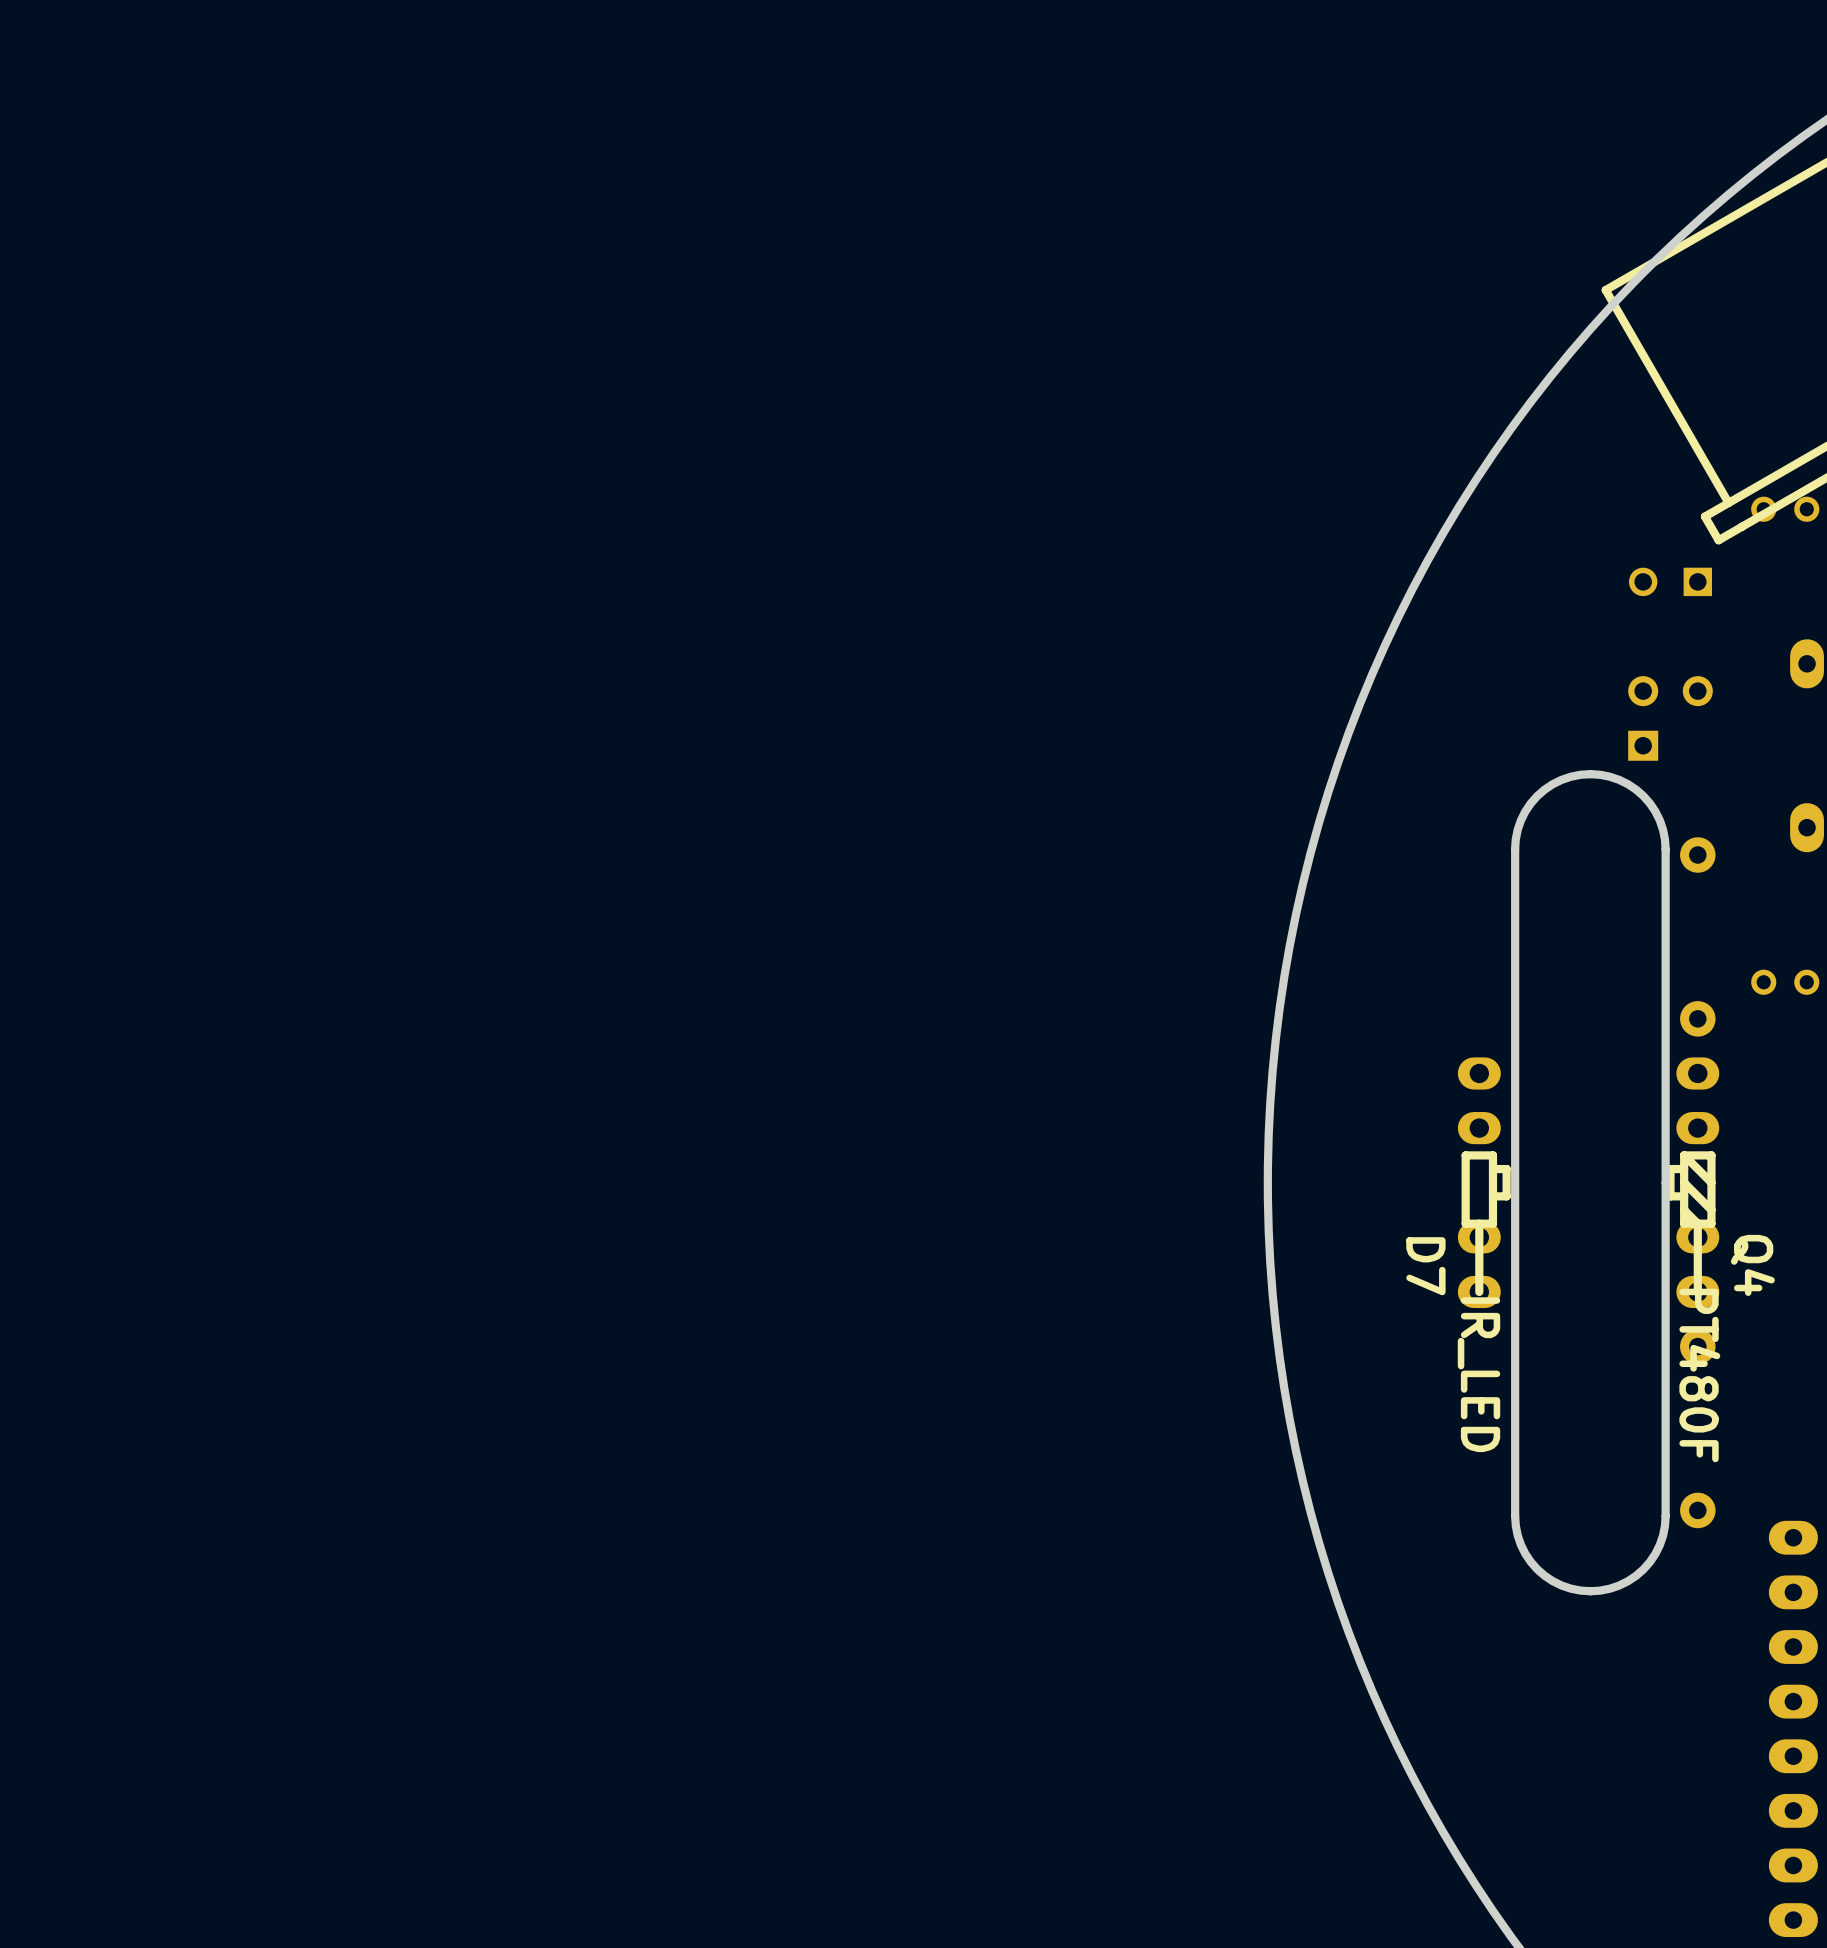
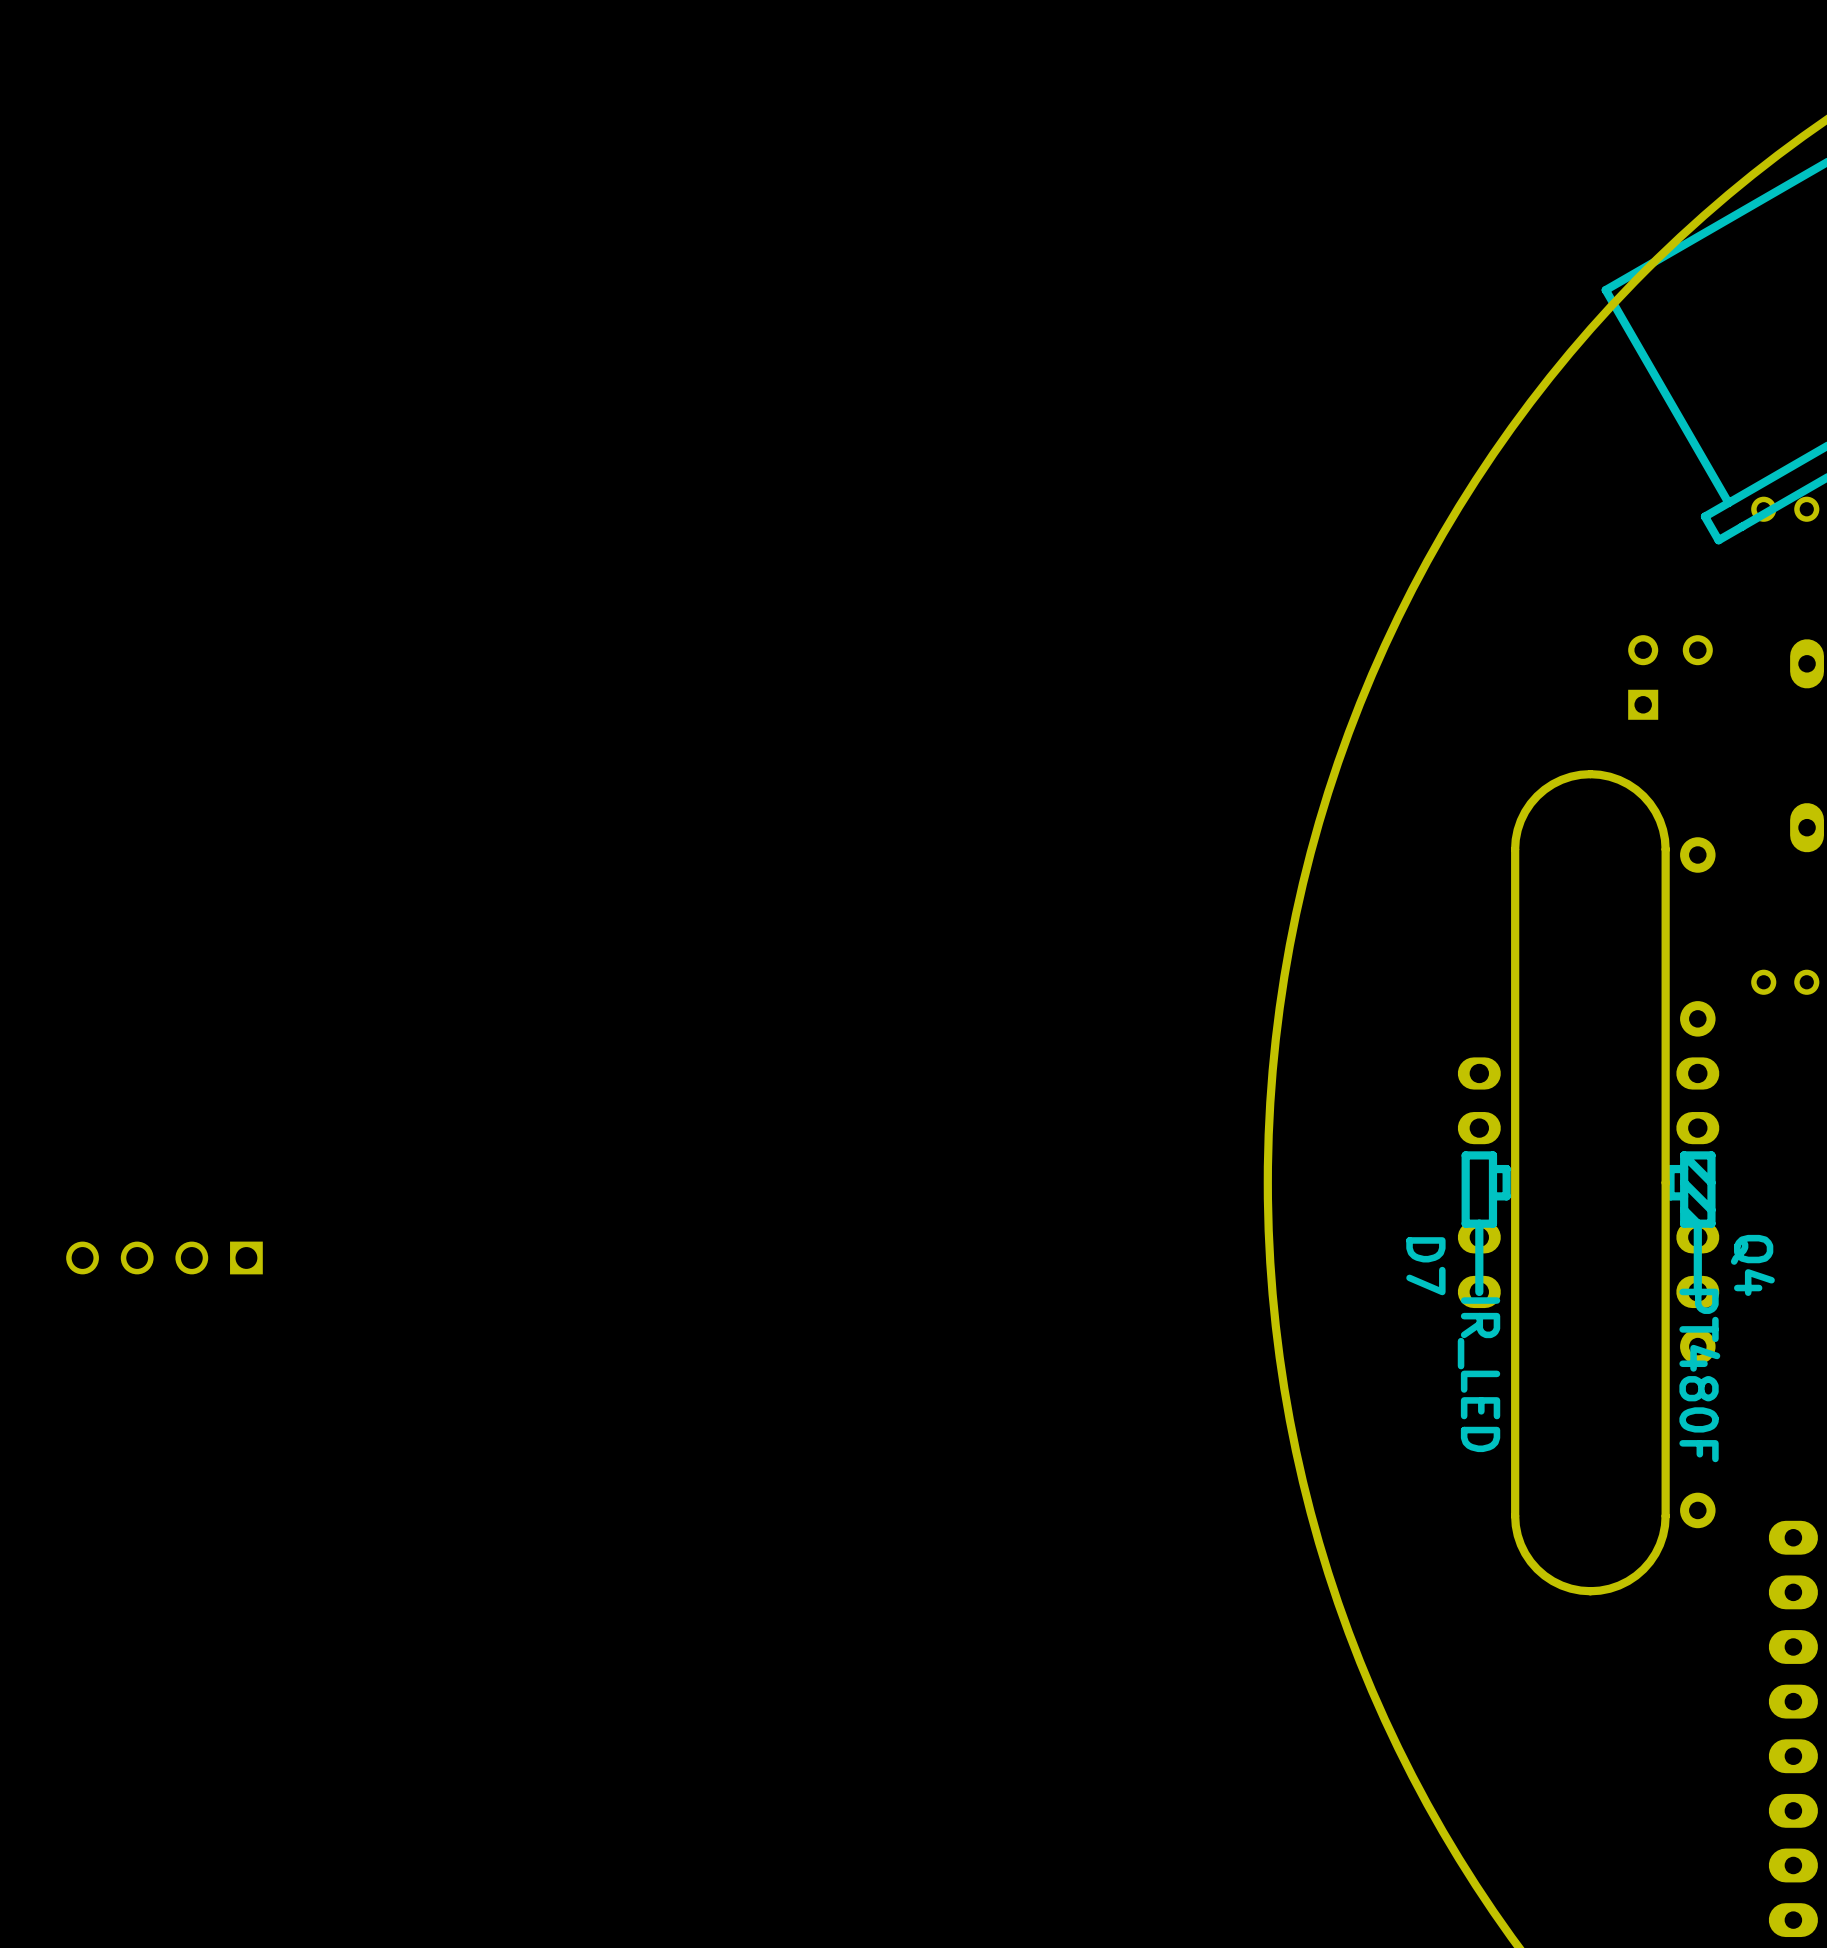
part: (1670, 581) -> none
part position: (1670, 718) -> (1670, 677)
part: none -> (164, 1257)

